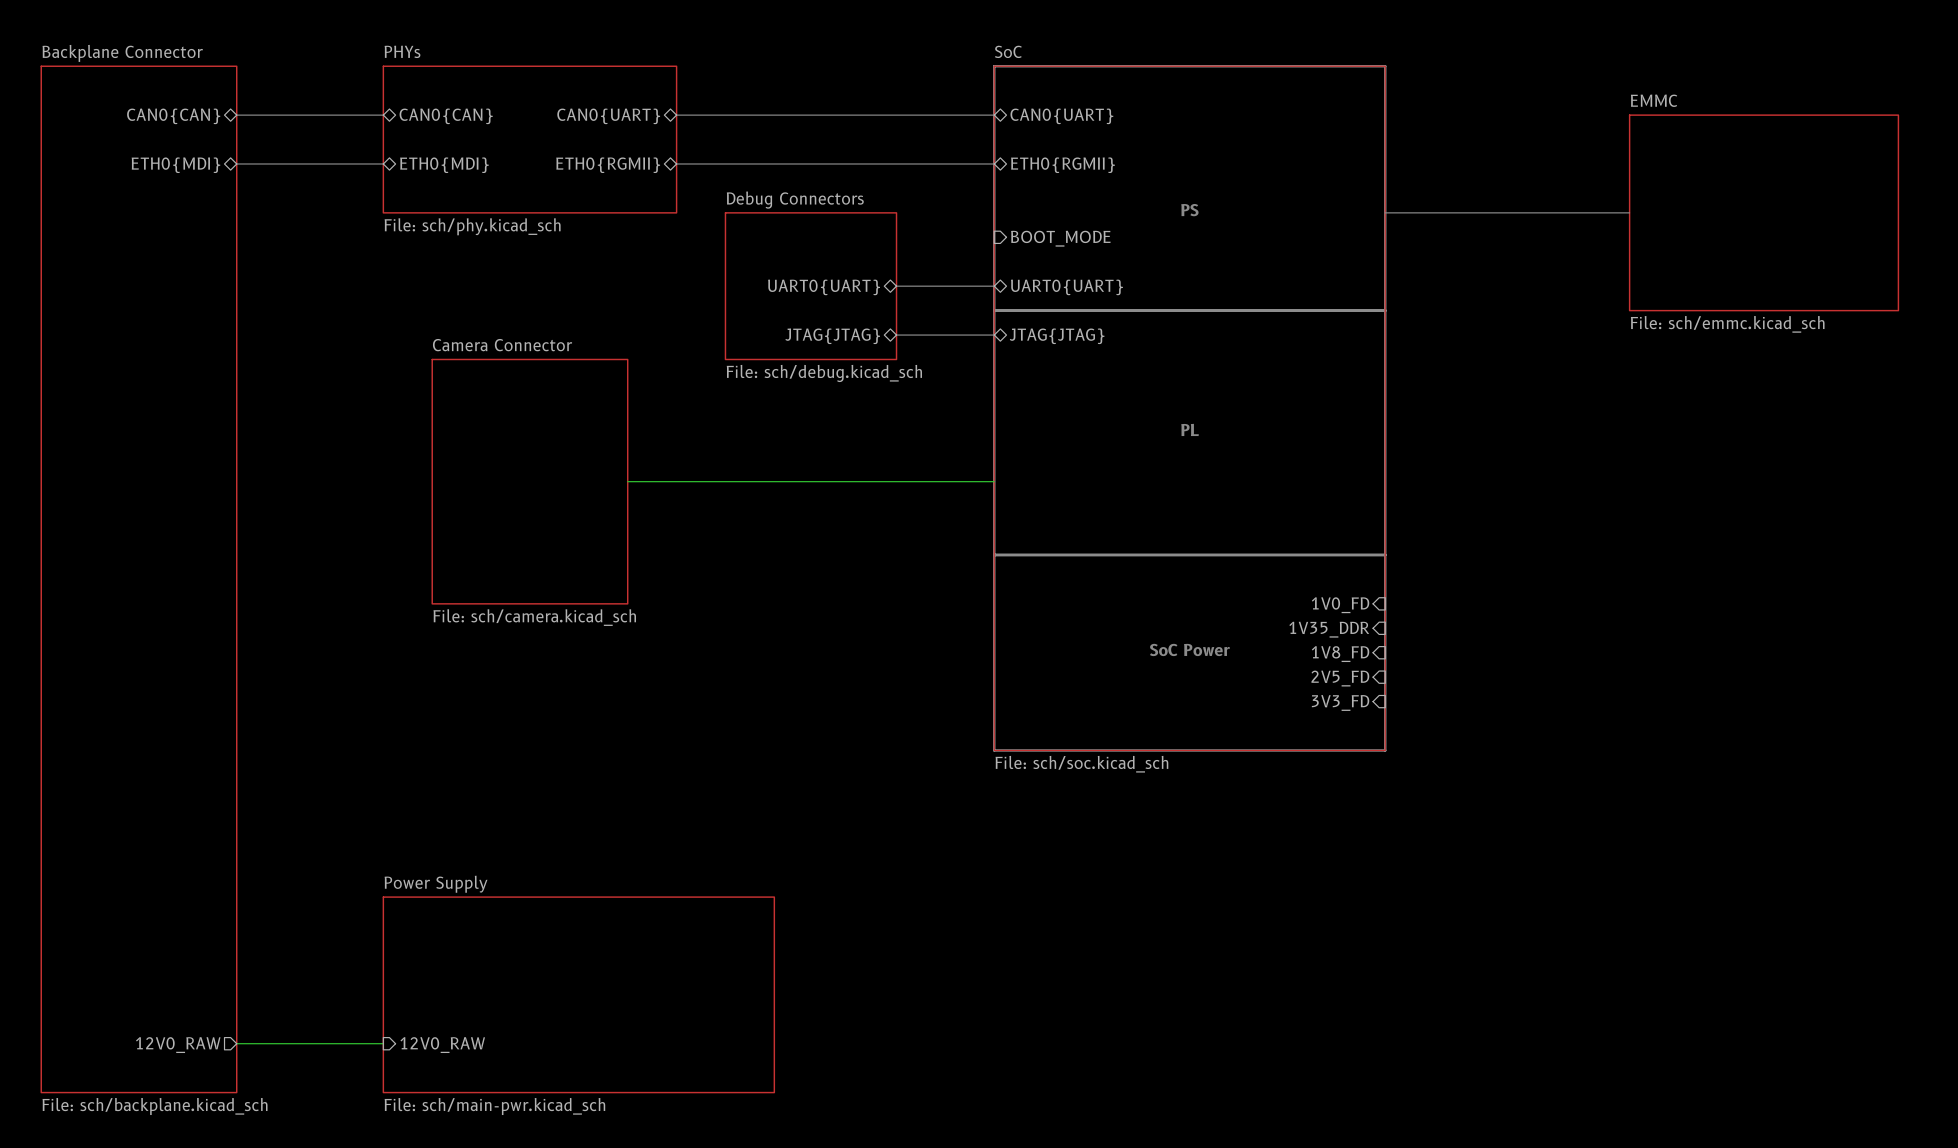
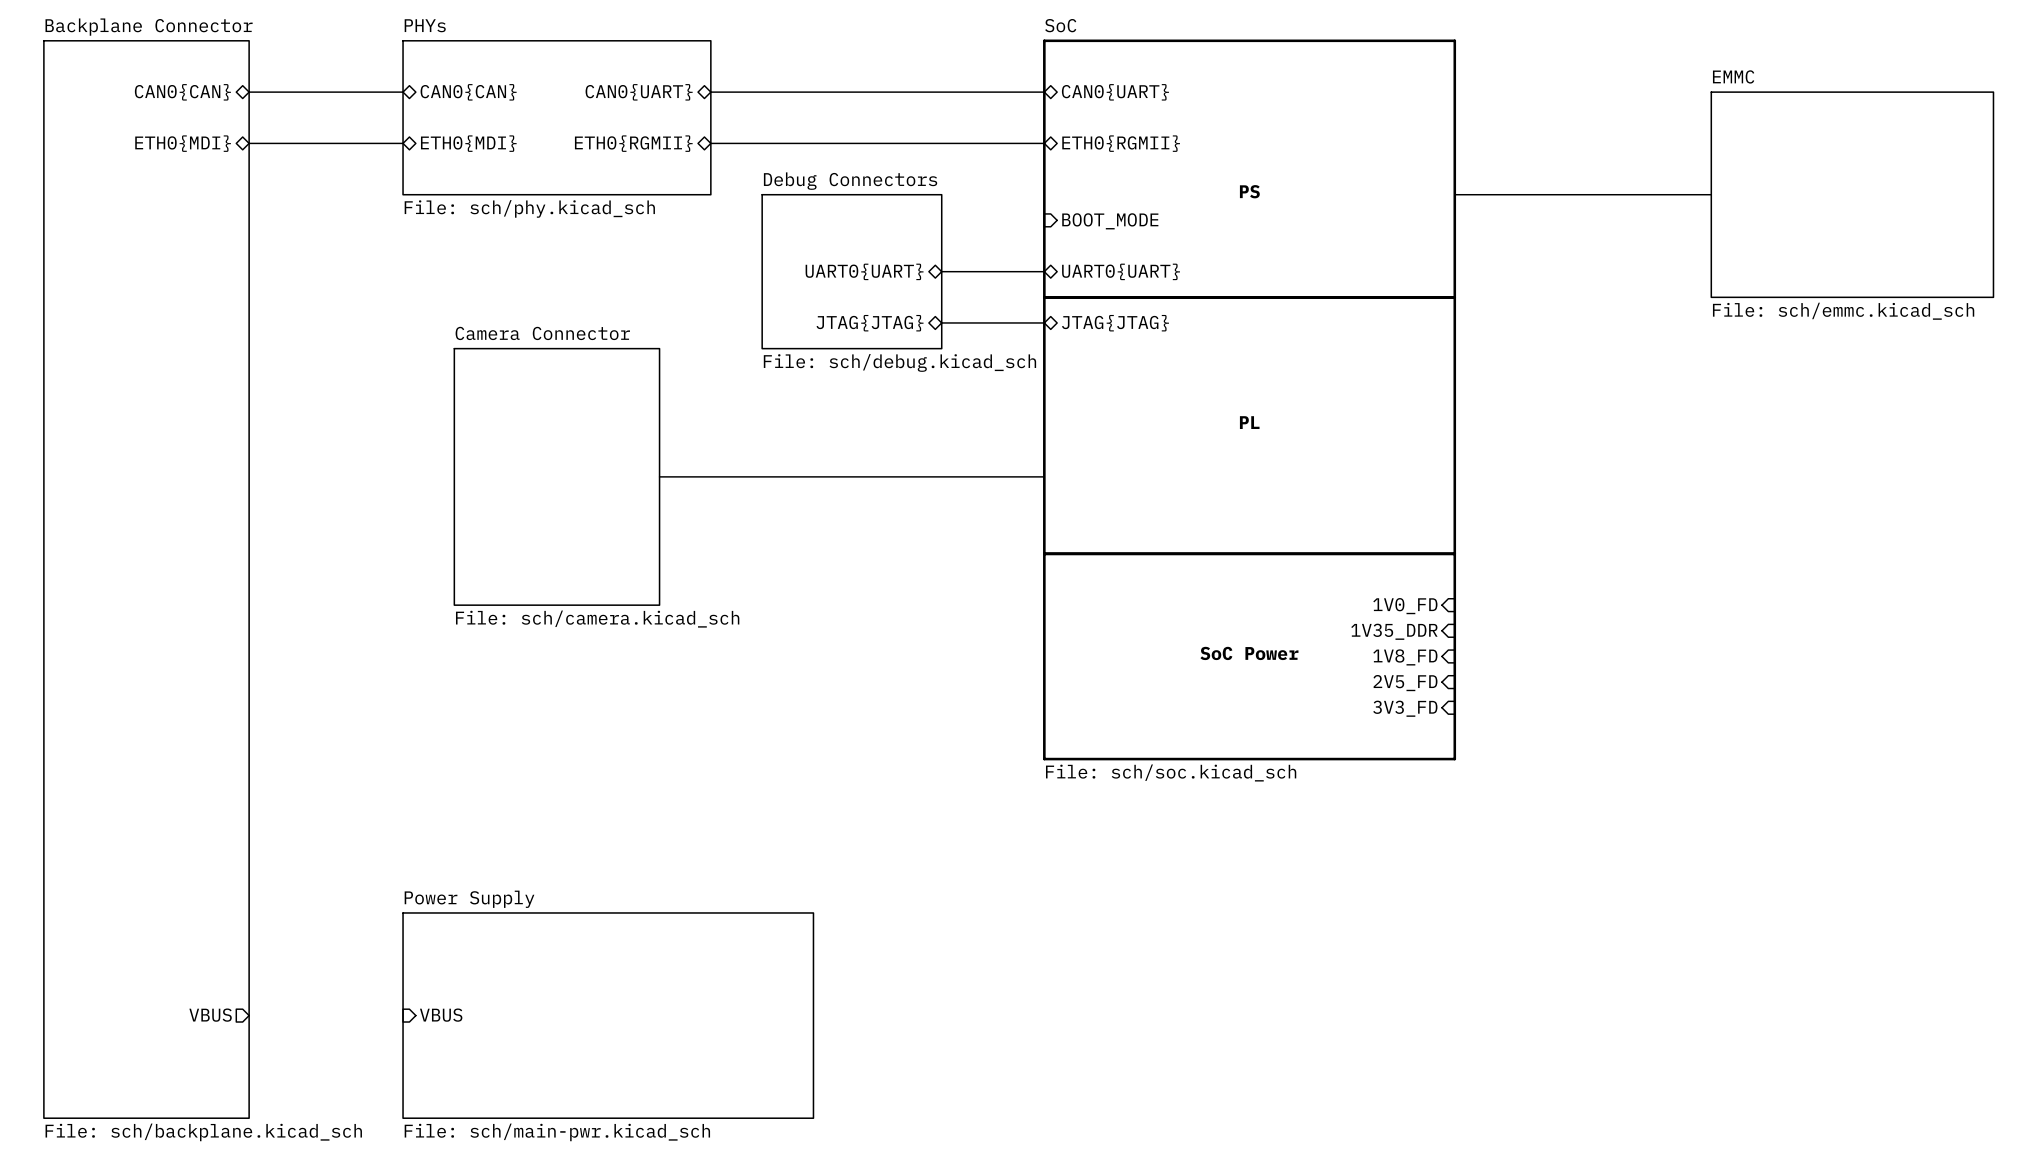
sheet pin: none -> VBUS (210, 1015)
sheet pin: none -> VBUS (441, 1015)
wire: (236, 1043) (383, 1043) -> none
sheet pin: 12V0_RAW (178, 1045) -> none
sheet pin: 12V0_RAW (442, 1045) -> none

